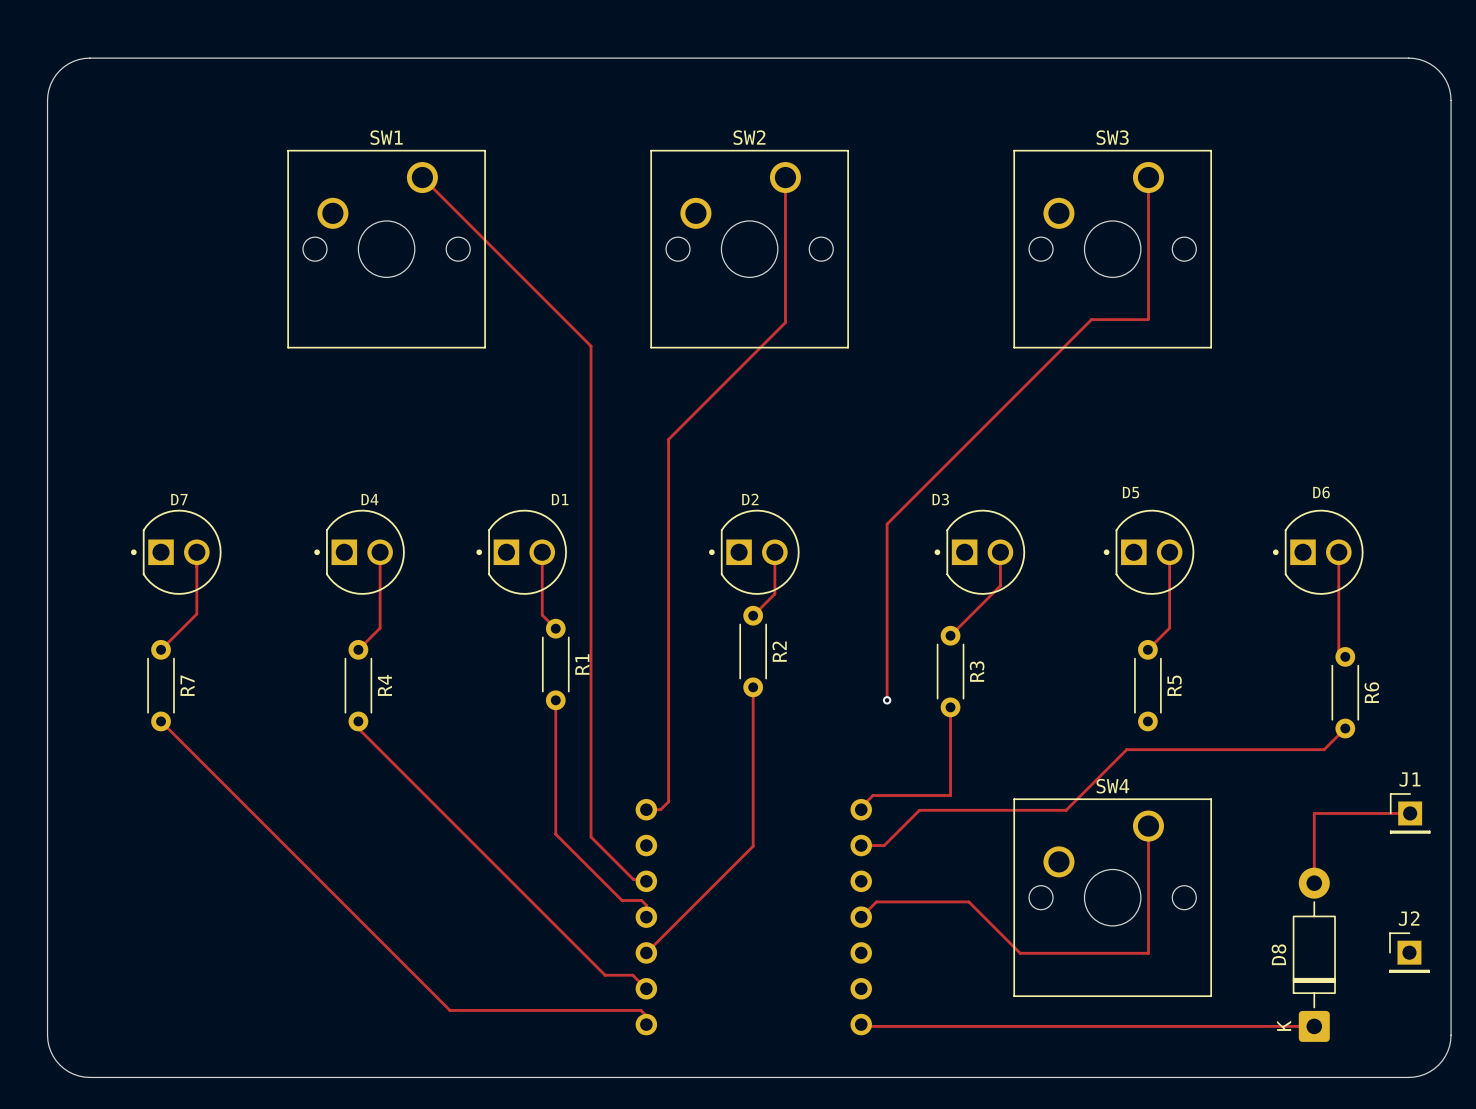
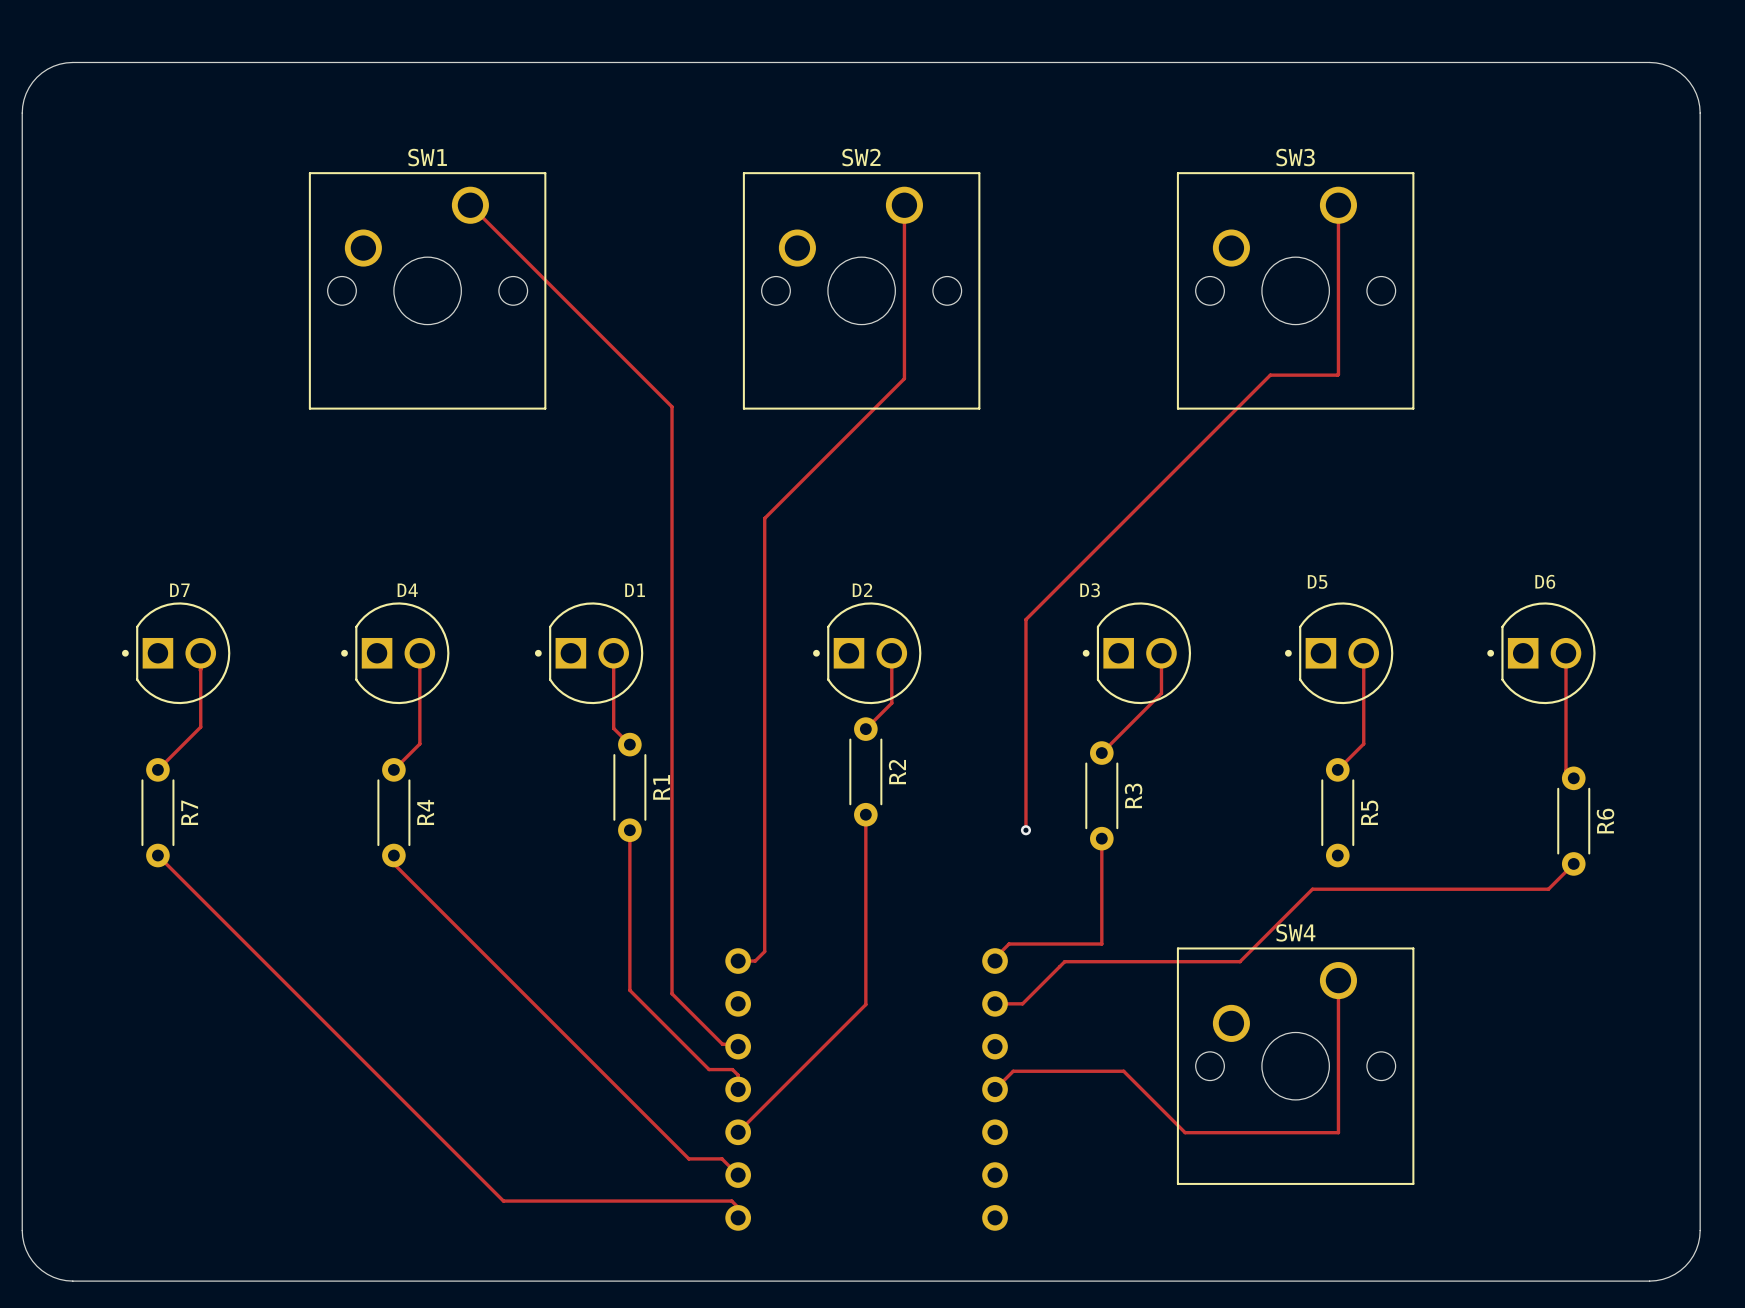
track: (1410, 813) (1314, 813) (1314, 883) -> none
J1: (1410, 813) -> none
J2: (1409, 952) -> none
D8: (1314, 954) -> none
track: (861, 1024) (863, 1026) (1314, 1026) -> none

